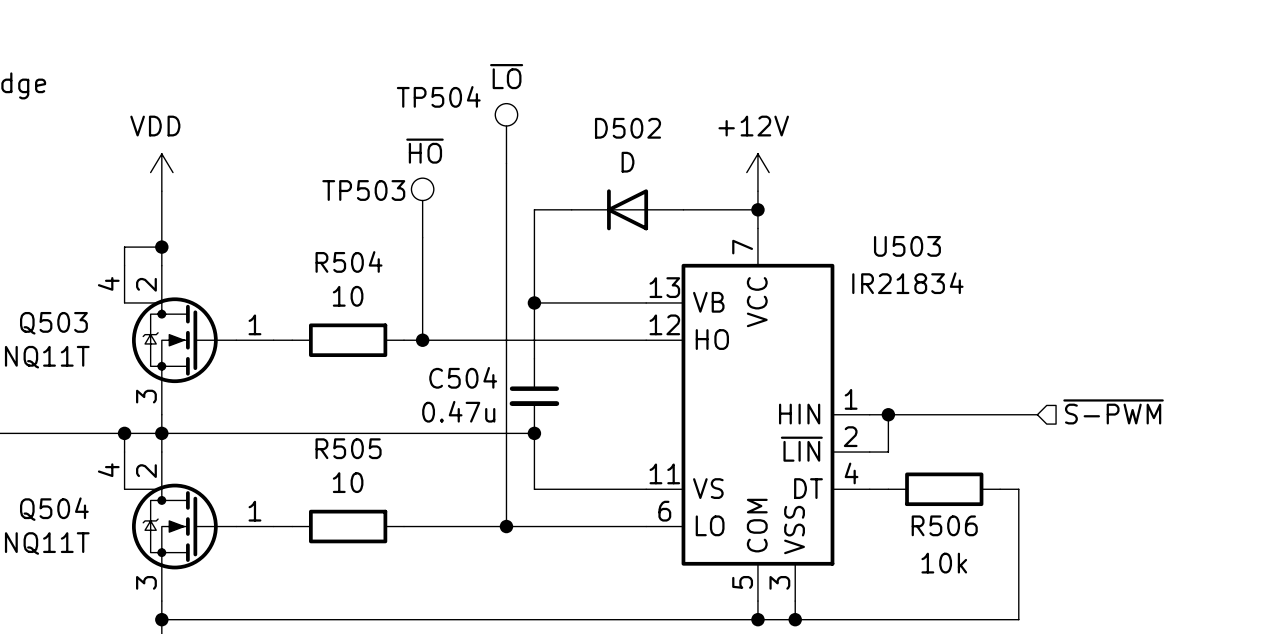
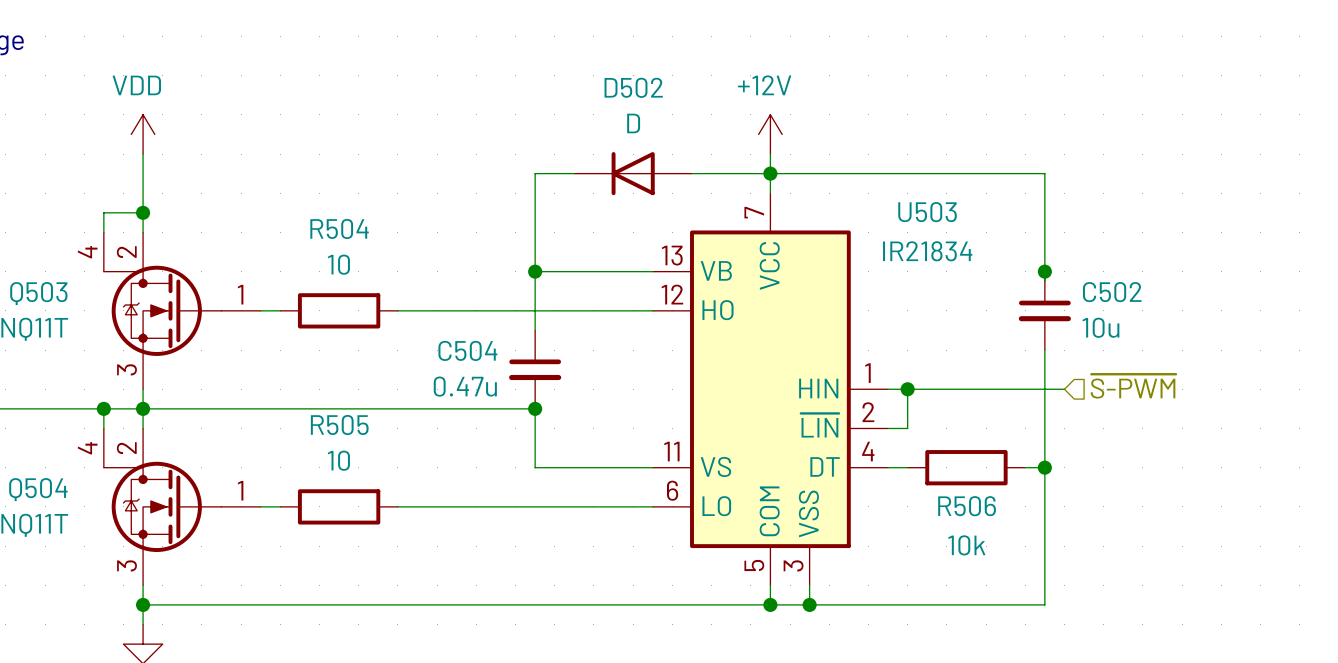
TP504: ~{LO} (506, 133) -> none
wire: (506, 163) (506, 526) -> none
TP503: ~{HO} (422, 207) -> none
wire: none -> (770, 173) (1044, 173) (1044, 281)
wire: (422, 237) (422, 340) -> none
junction: none -> (1044, 271)
junction: (422, 340) -> none
C502: none -> 10u (1044, 310)
wire: none -> (1044, 350) (1044, 467)
junction: none -> (1044, 467)
junction: (506, 526) -> none

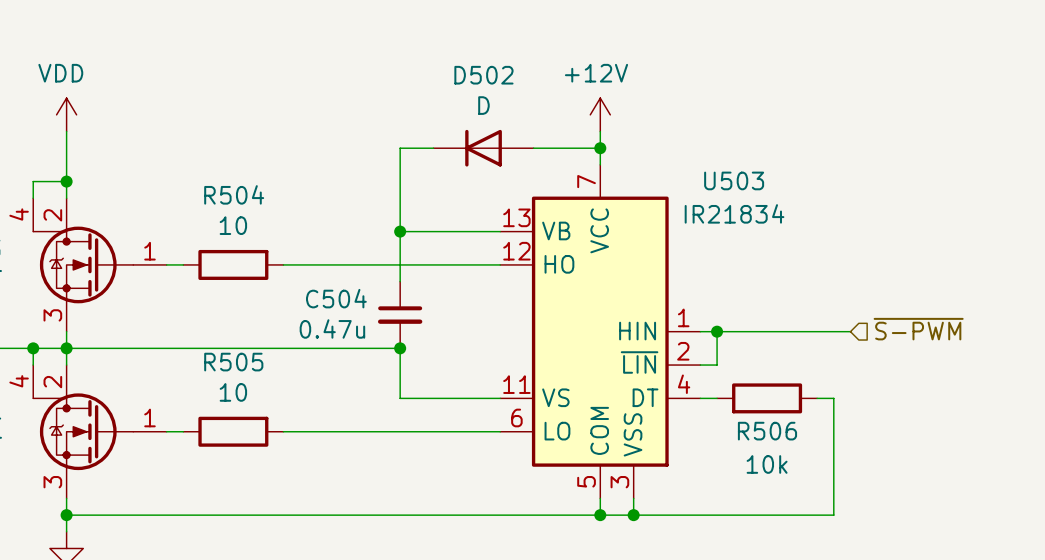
wire: (770, 173) (1044, 173) (1044, 281) -> none
junction: (1044, 271) -> none
C502: 10u (1044, 310) -> none
wire: (1044, 350) (1044, 467) -> none
junction: (1044, 467) -> none

